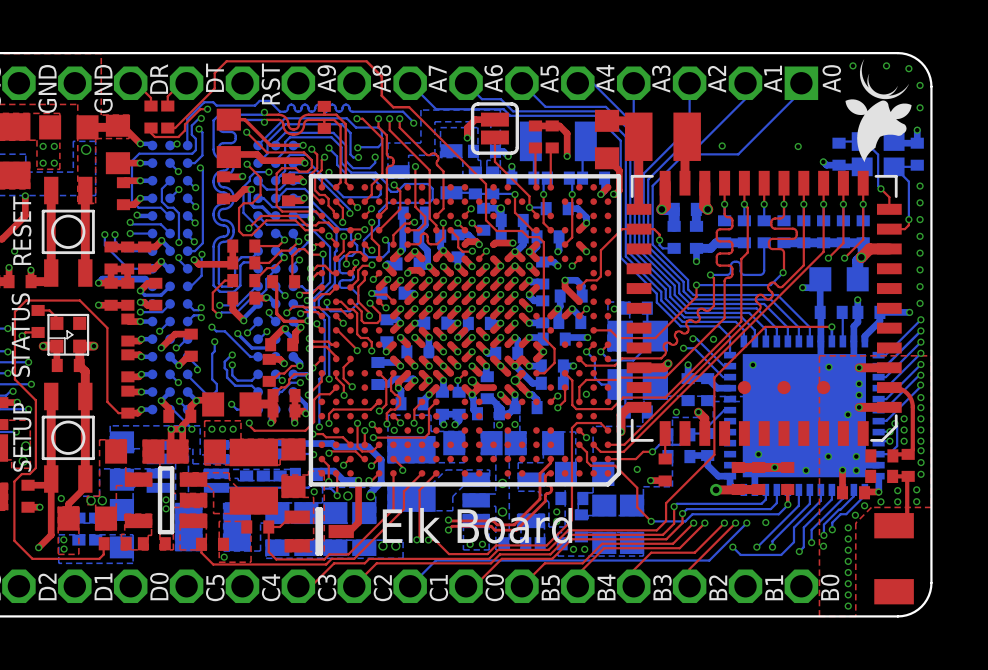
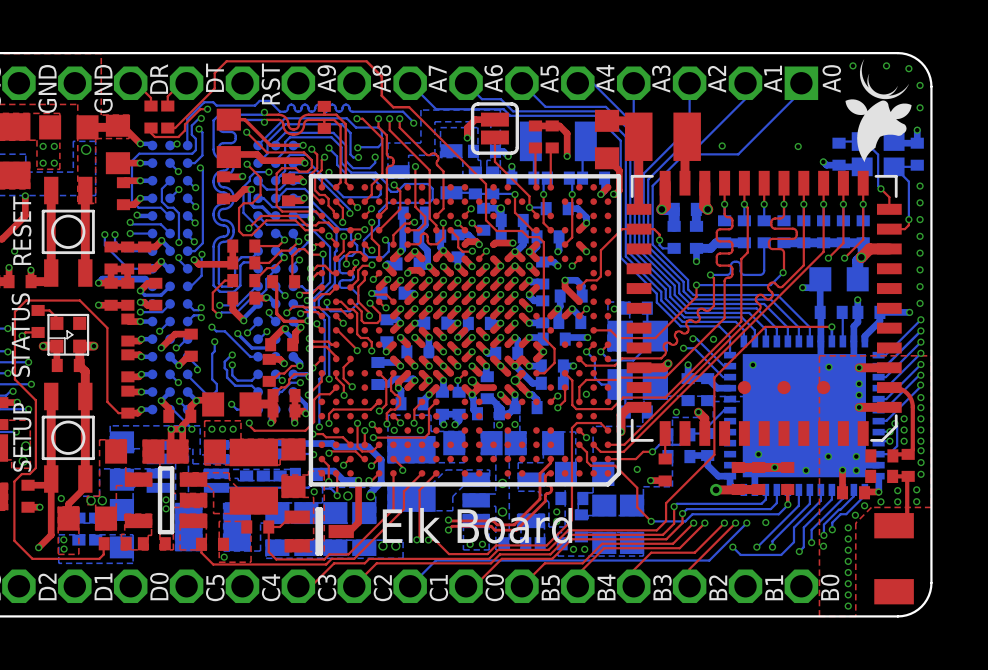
via: (847, 414) -> none

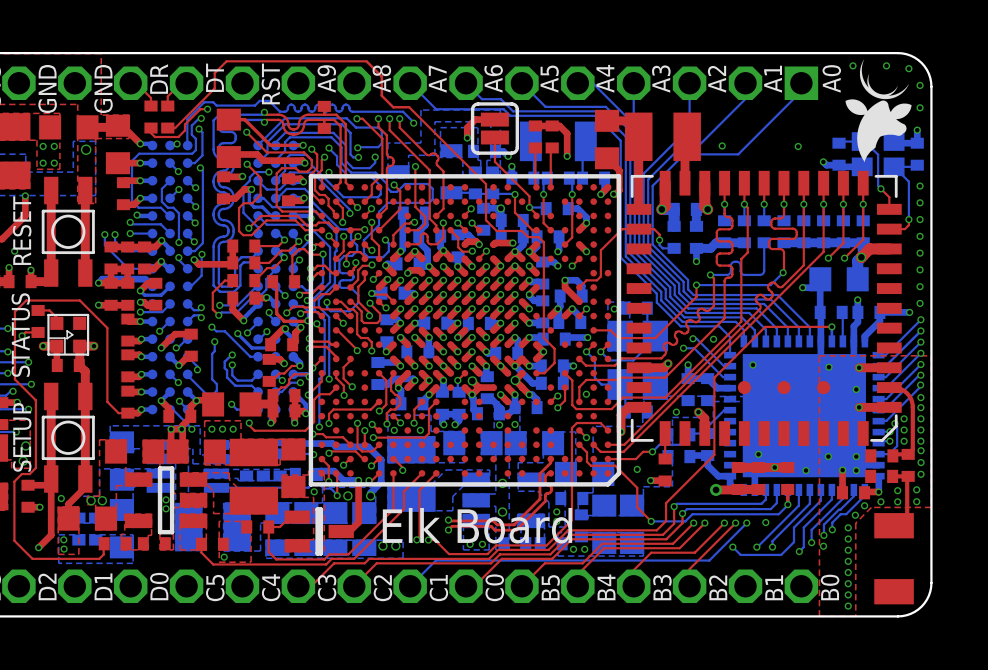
via: (859, 383) -> none
via: none -> (856, 389)
via: (859, 395) -> none

